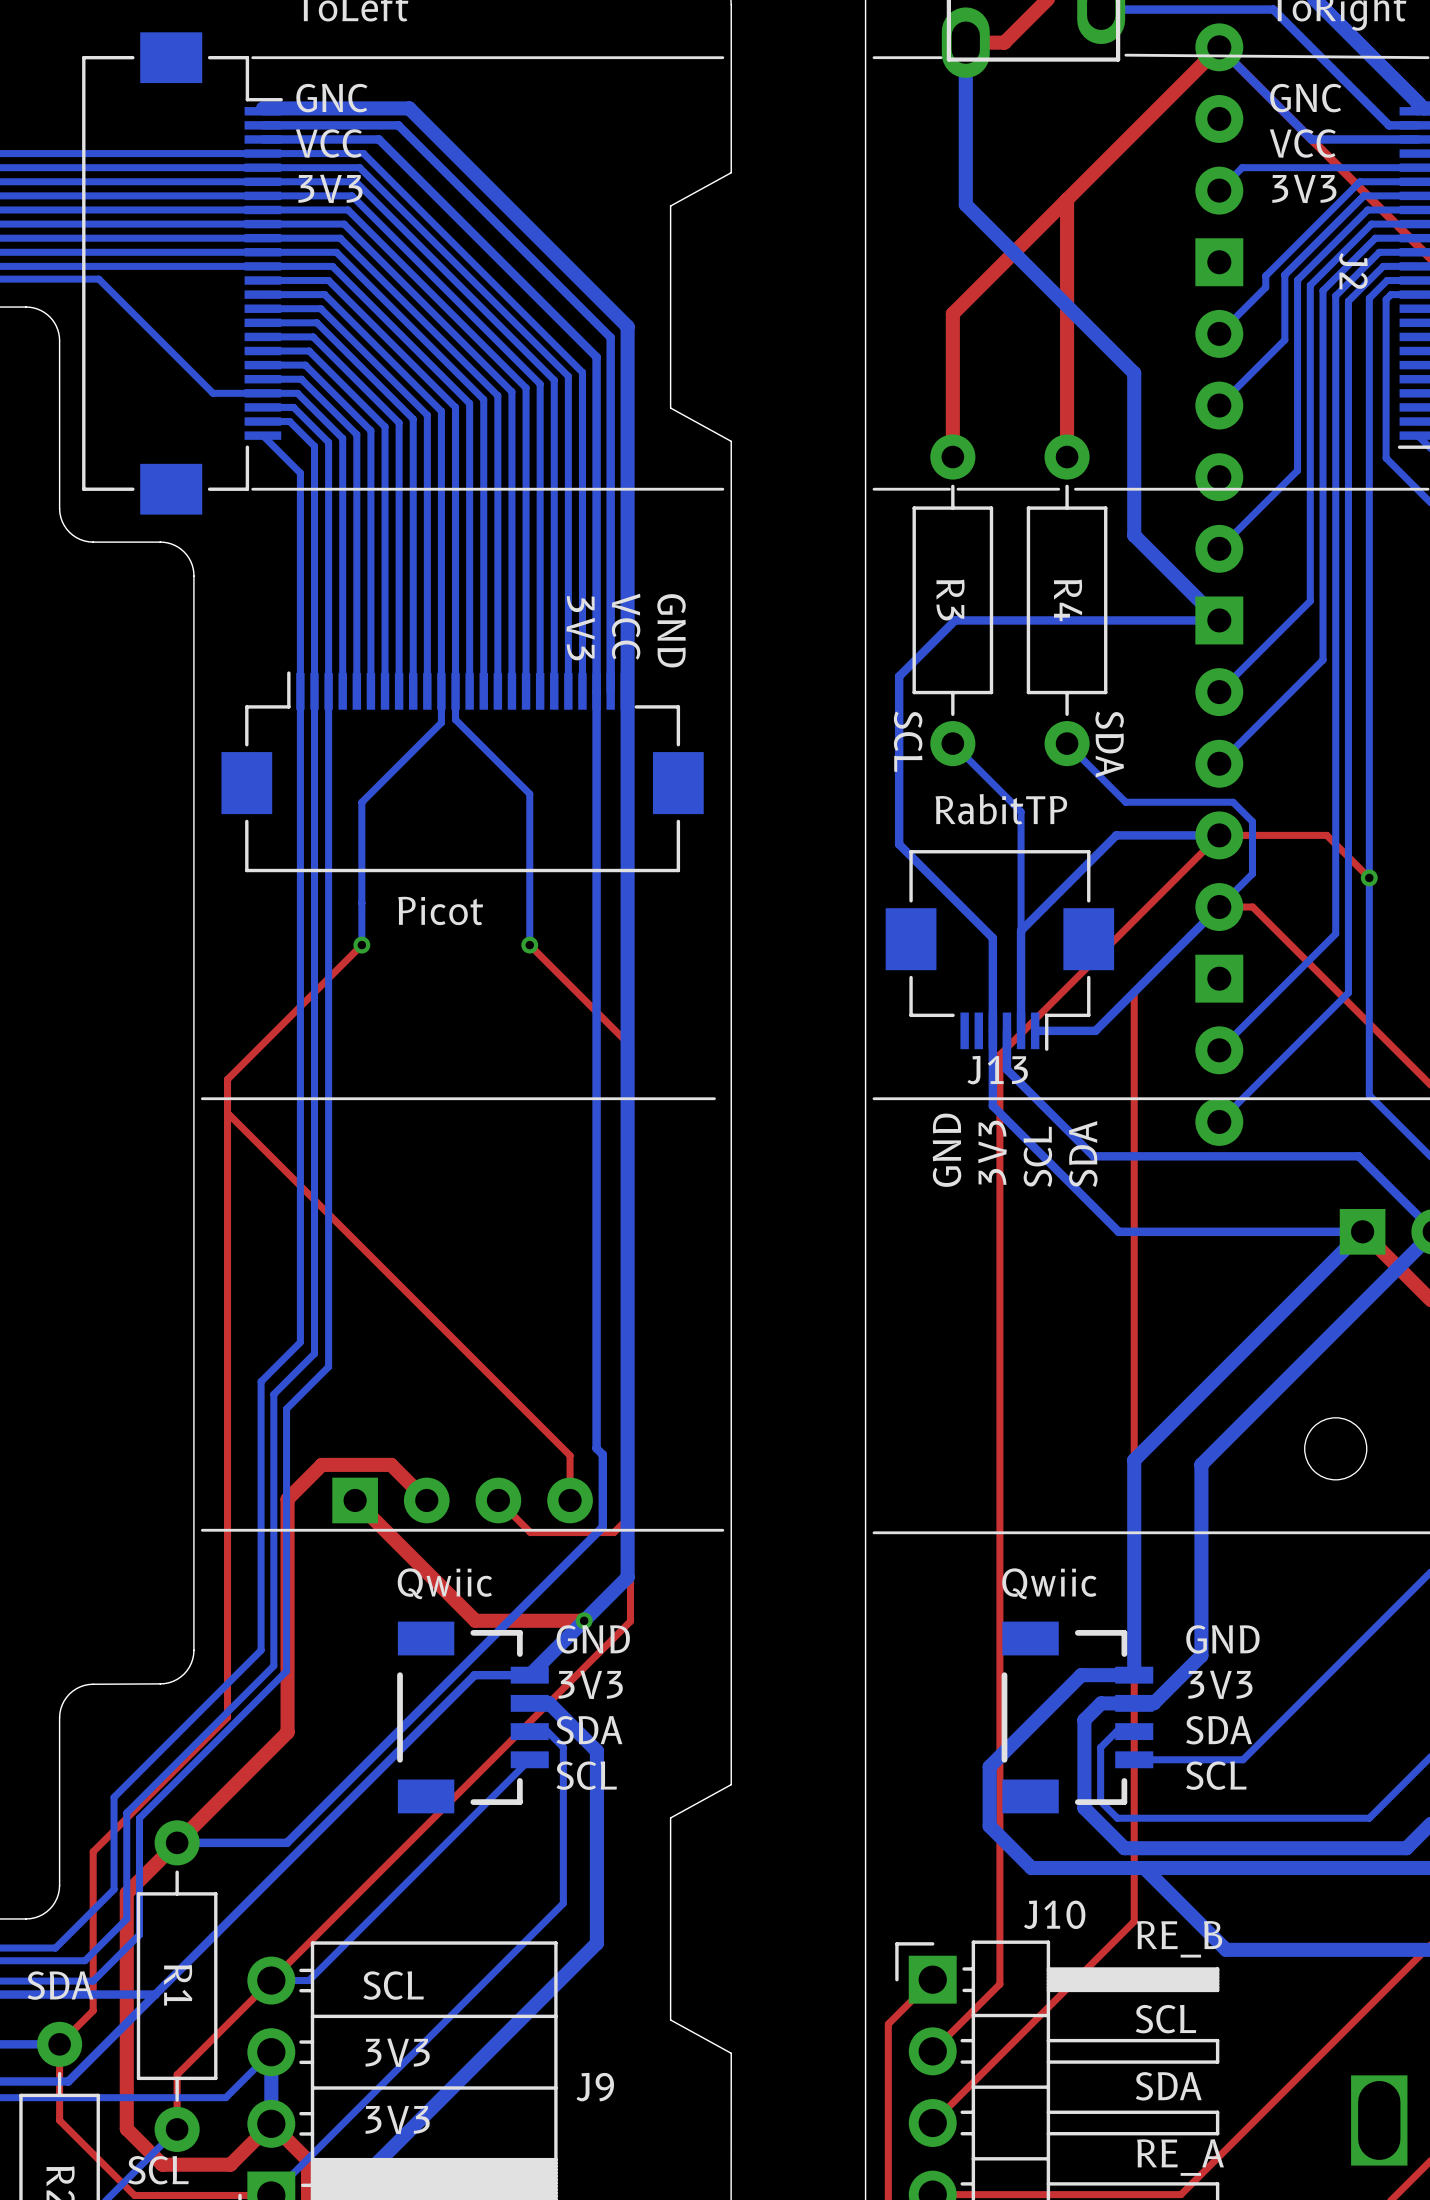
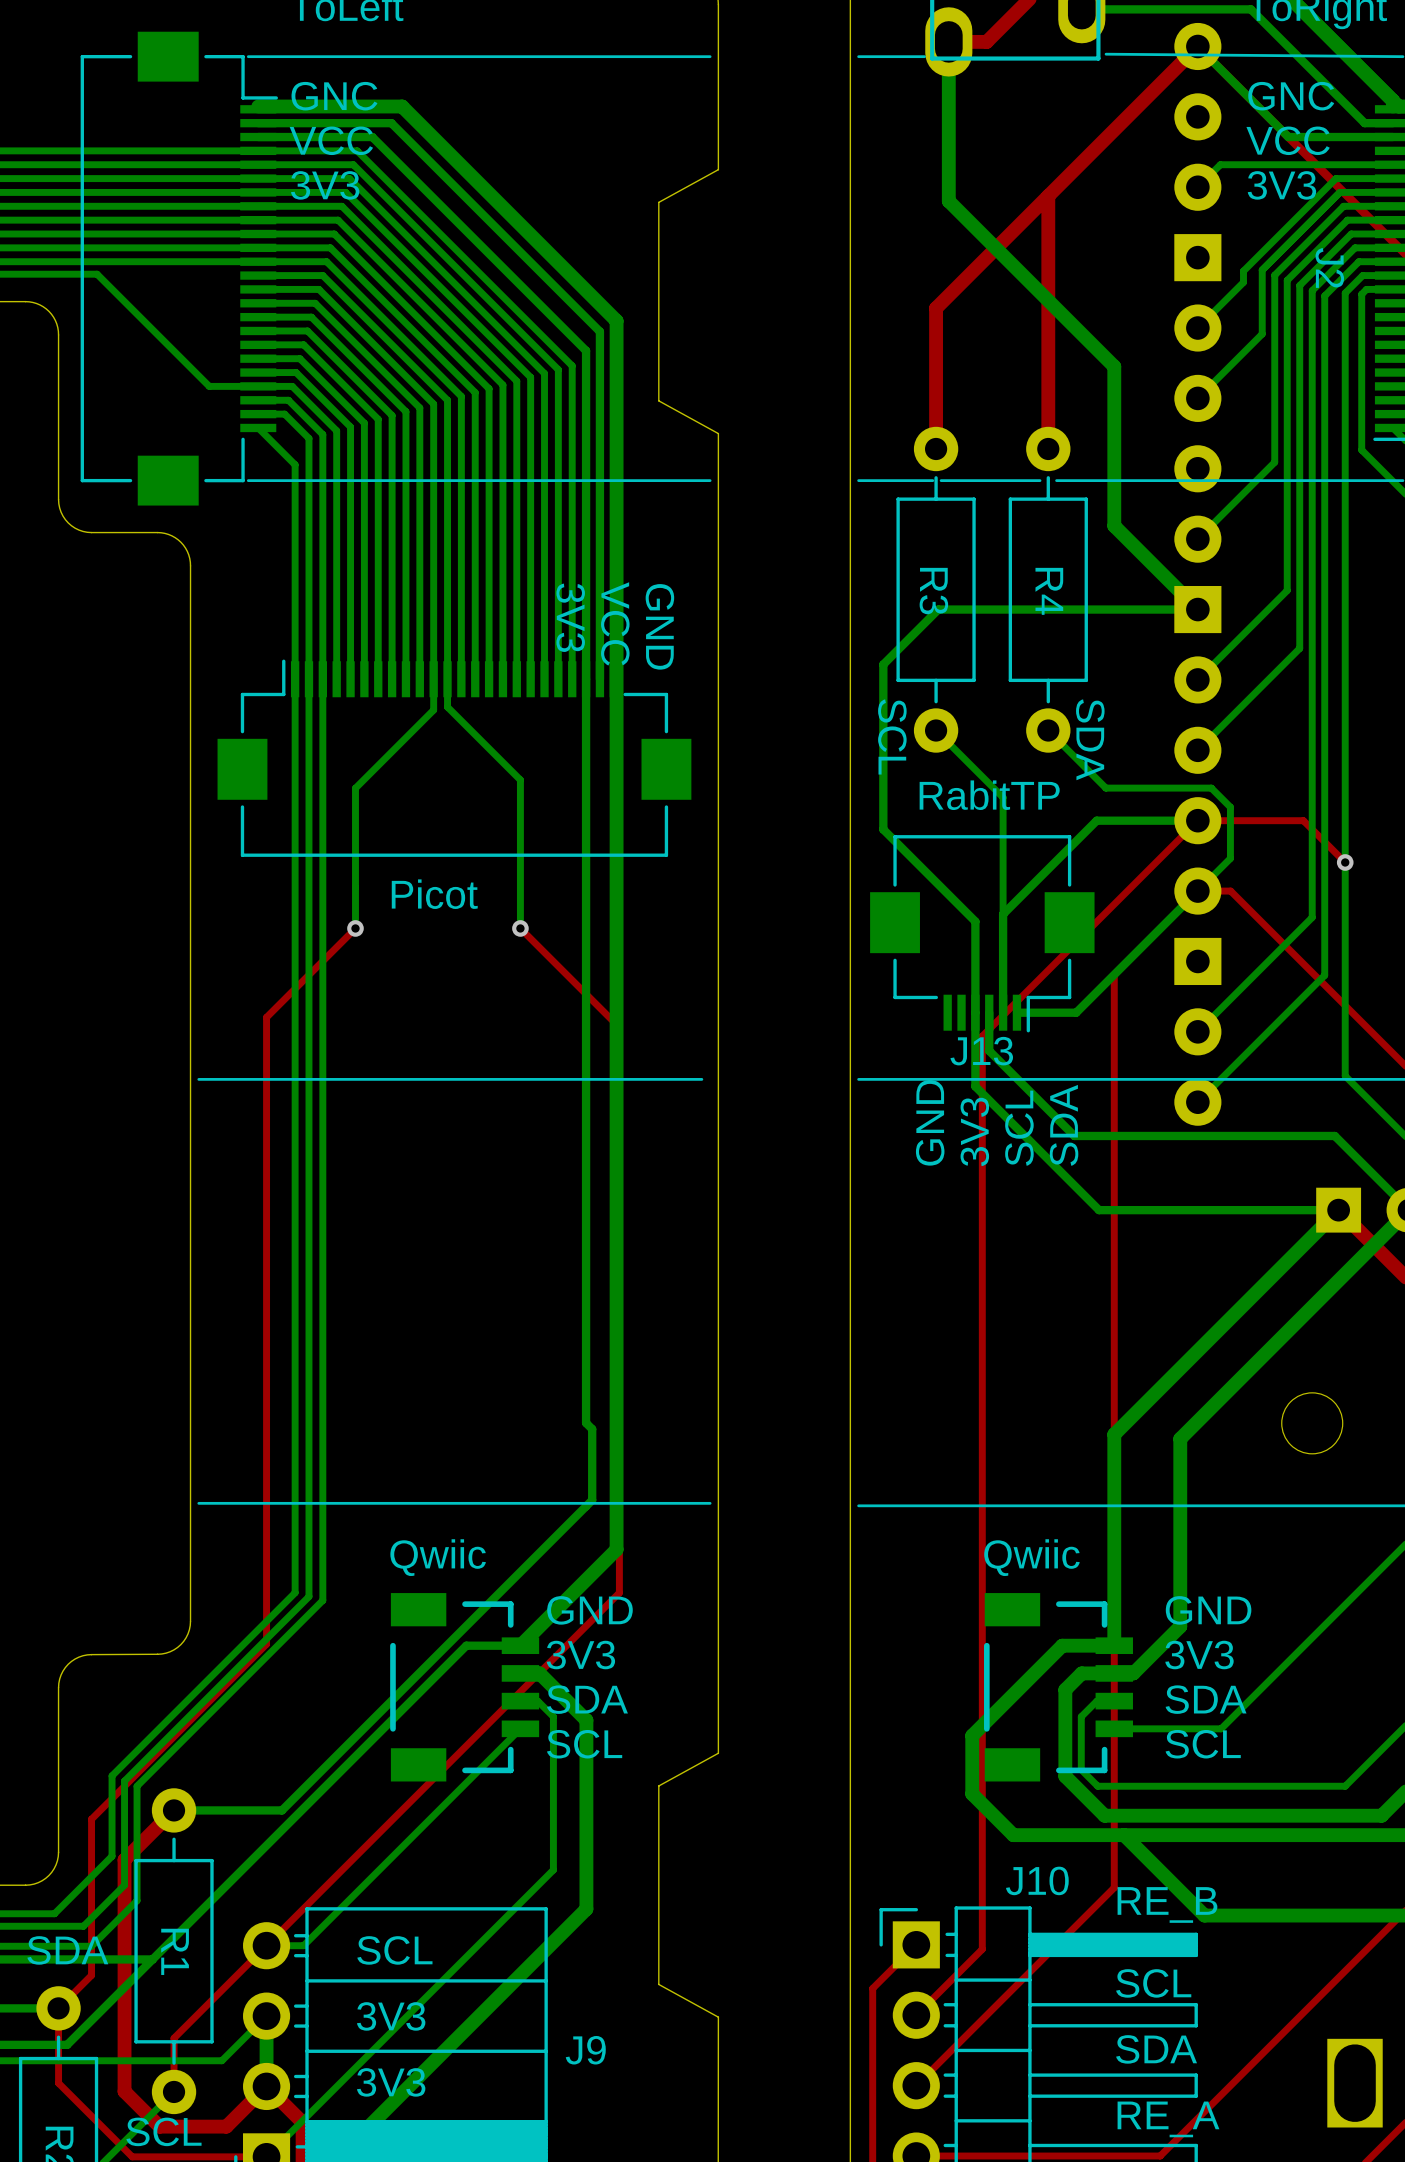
top track: (271, 1035) (227, 1079) (227, 1717) -> (266, 1017) (266, 1644) (223, 1687)
top track: (227, 1113) (570, 1455) (570, 1500) -> none
bottom track: (300, 1342) (261, 1381) (261, 1650) (114, 1797) (114, 1807) -> (295, 1318) (295, 1592) (112, 1775)
bottom track: (314, 1353) (273, 1394) (273, 1665) -> (308, 1329) (308, 1596) (269, 1636)
bottom track: (328, 1366) (286, 1408) (286, 1671) -> (322, 1342) (322, 1600) (281, 1641)
top track: (355, 1500) (475, 1620) (584, 1620) -> none
top track: (426, 1500) (391, 1464) (321, 1464) (287, 1499) (287, 1732) (177, 1842) -> none
part: (462, 1500) -> none
top track: (498, 1500) (530, 1532) (613, 1532) (630, 1515) -> none
via: (584, 1620) -> none

